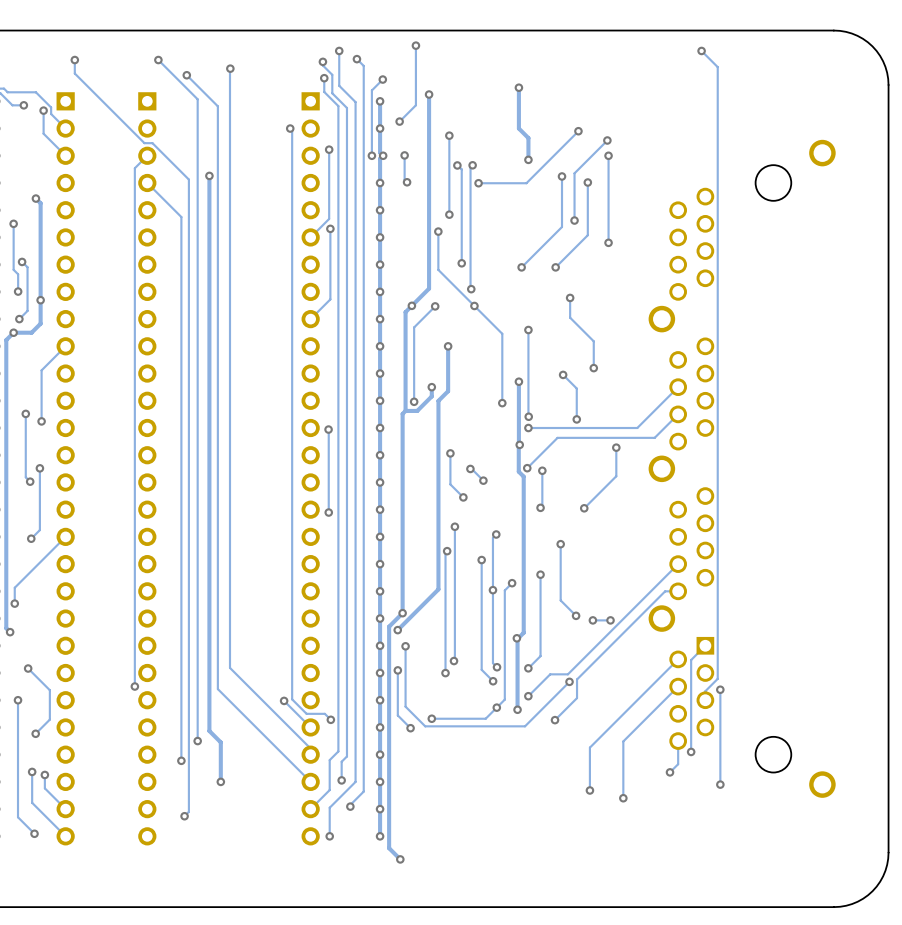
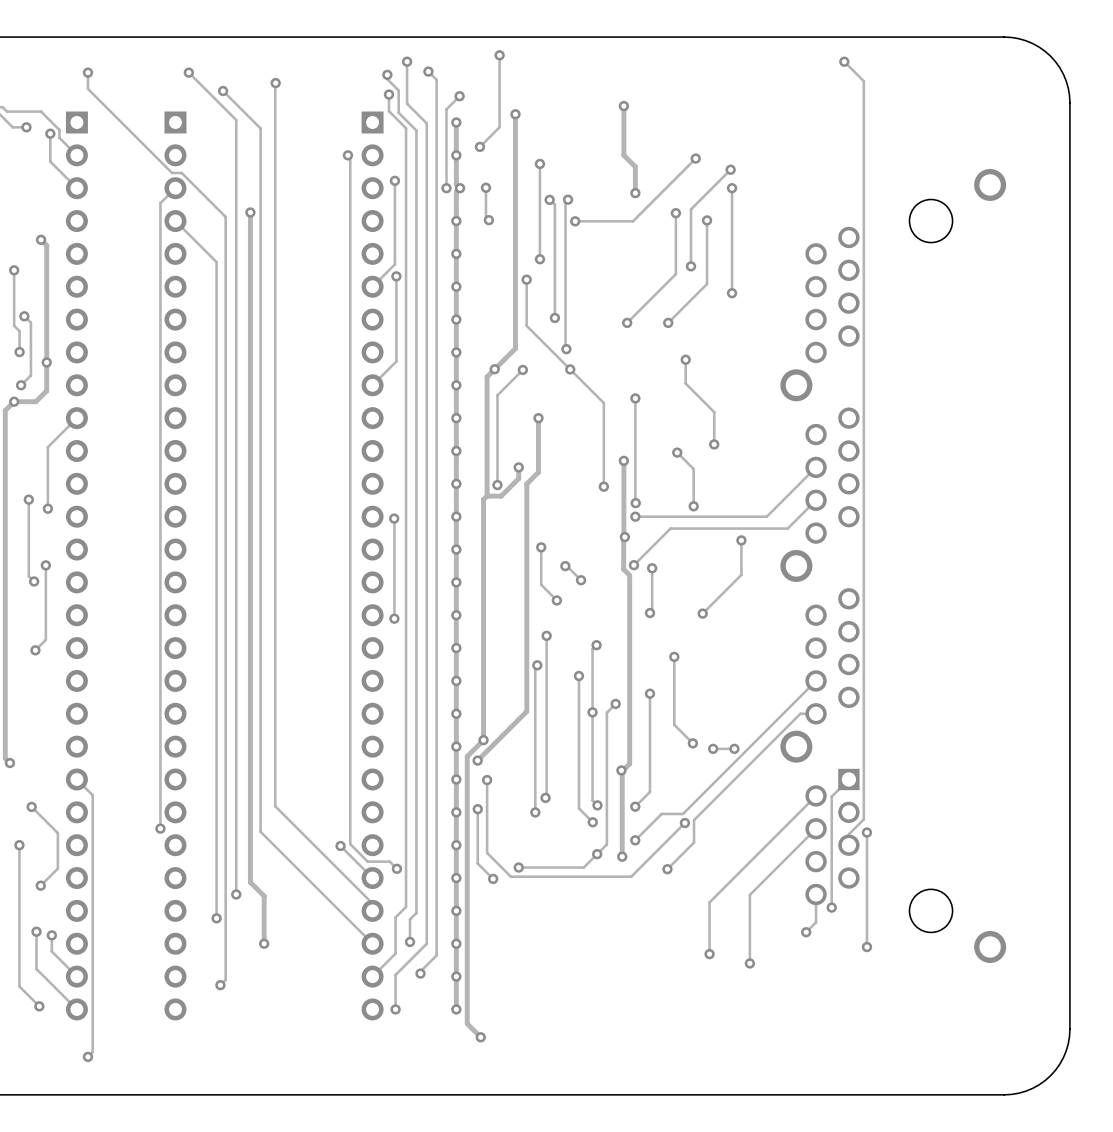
track: (65, 536) (14, 587) (14, 603) -> none
via: (14, 603) -> none
track: none -> (76, 779) (92, 795) (92, 1052) (87, 1056)
via: none -> (87, 1056)

